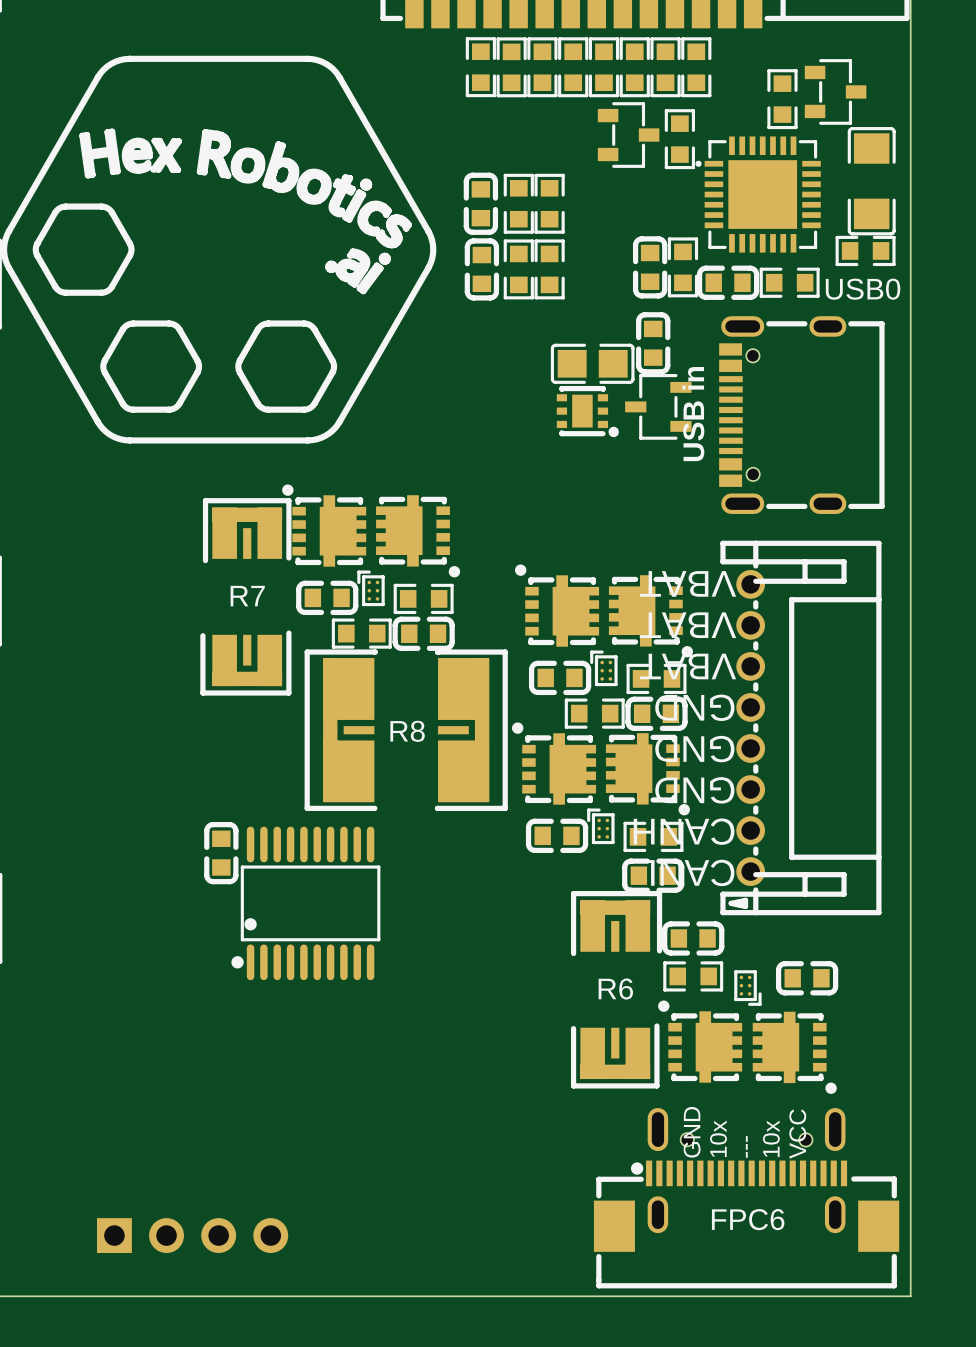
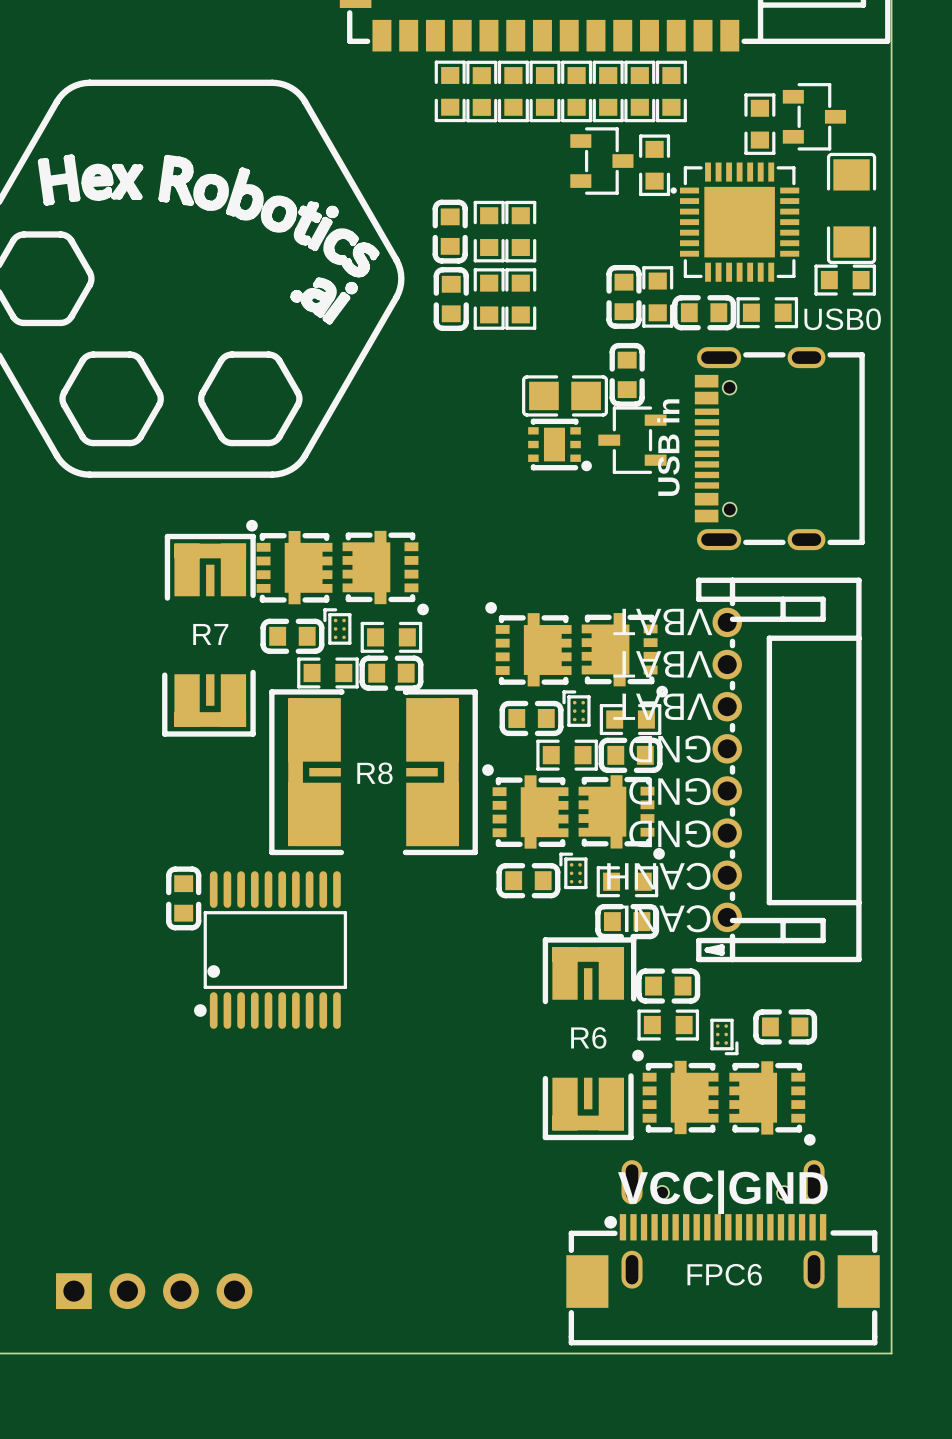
text: GND (692, 1132) -> none
text: VCC (797, 1134) -> none
text: 10x (718, 1138) -> none
text: 10x (771, 1138) -> none
text: none -> VCC|GND (722, 1192)
text: --- (746, 1146) -> none

